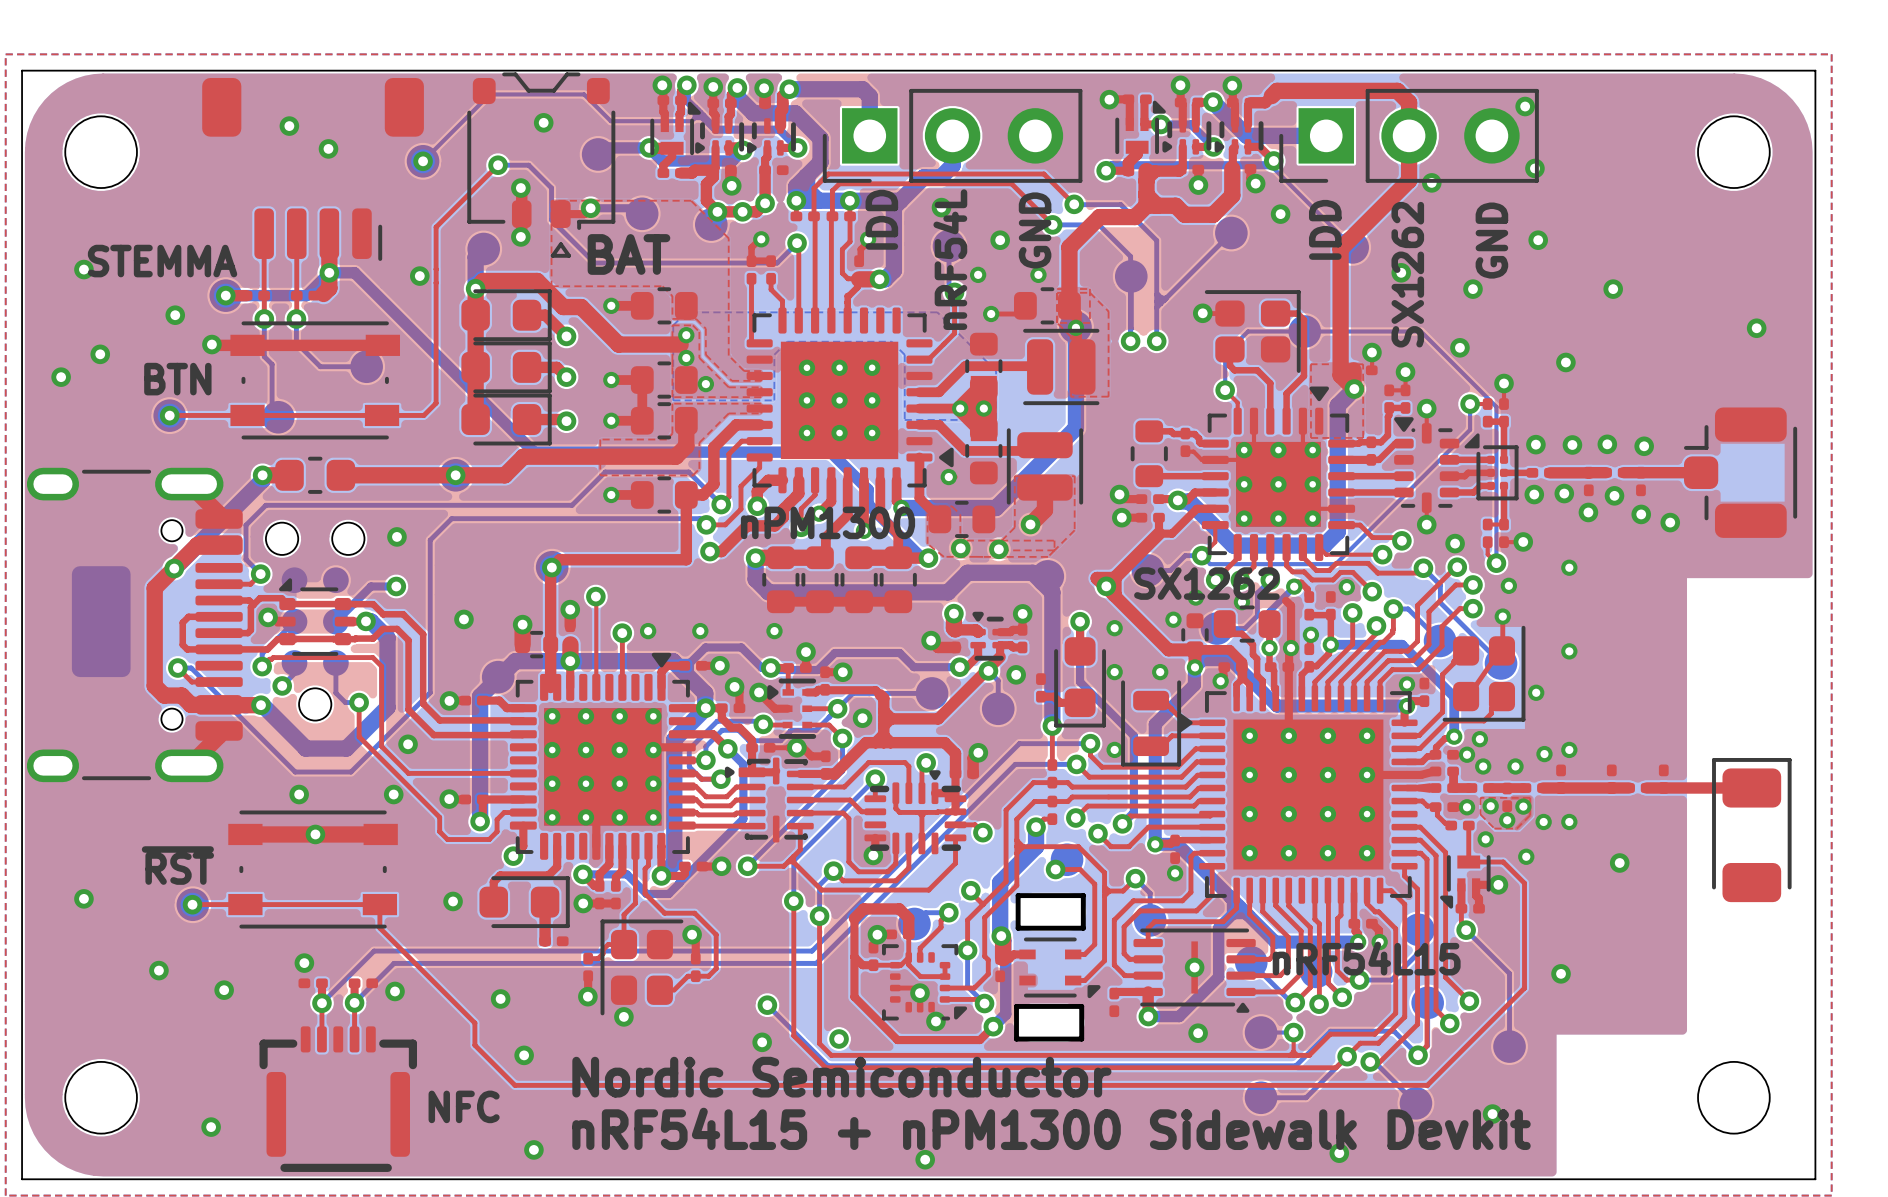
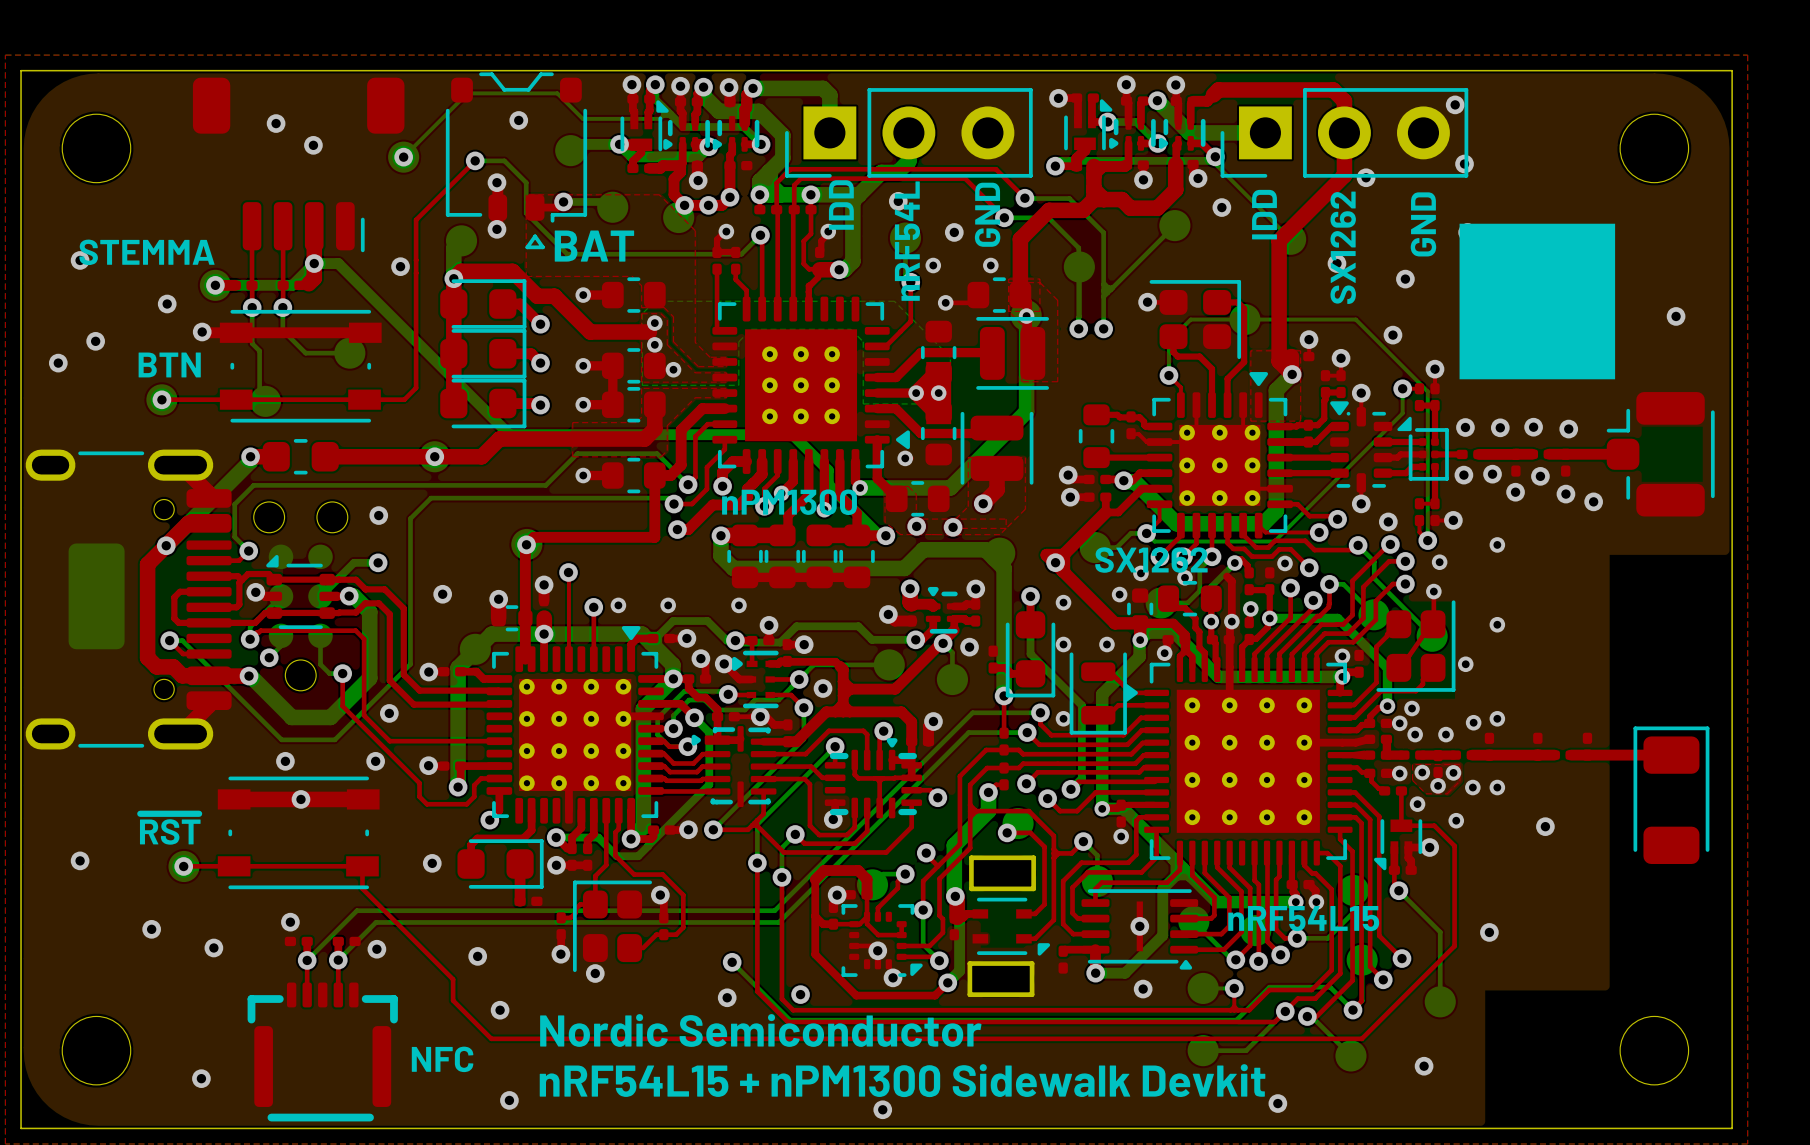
drawing: none -> [1459, 223, 1616, 380]

